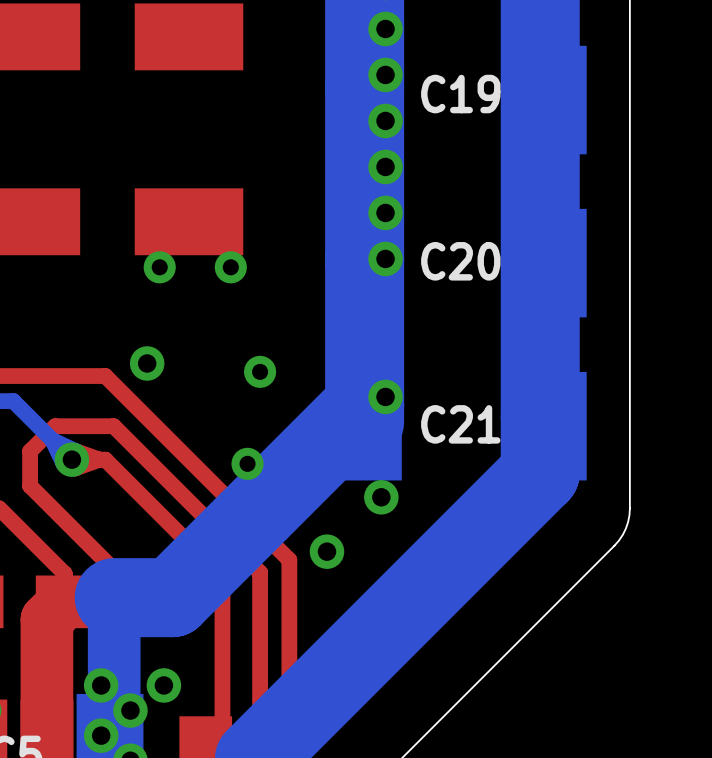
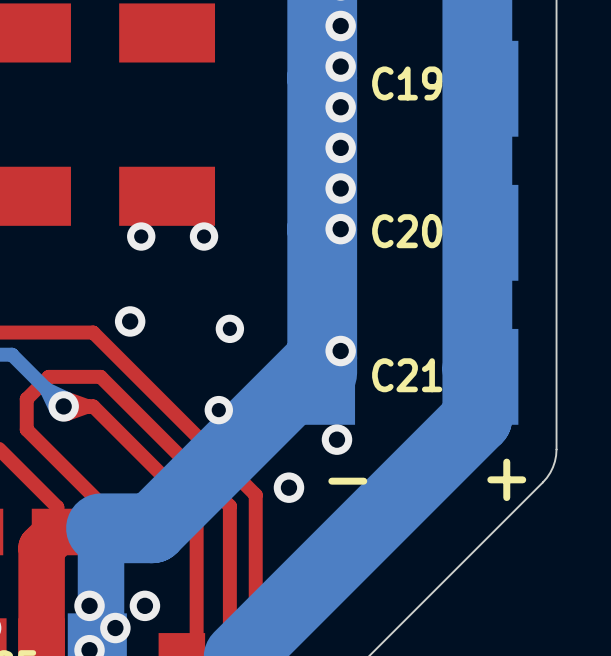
text: none -> + (506, 479)
text: none -> - (347, 481)

